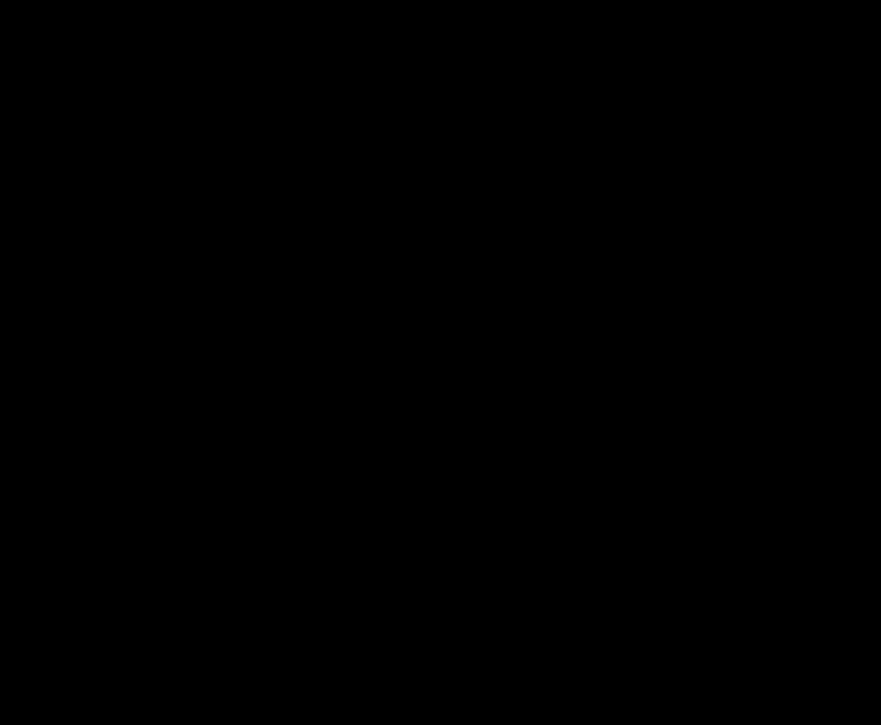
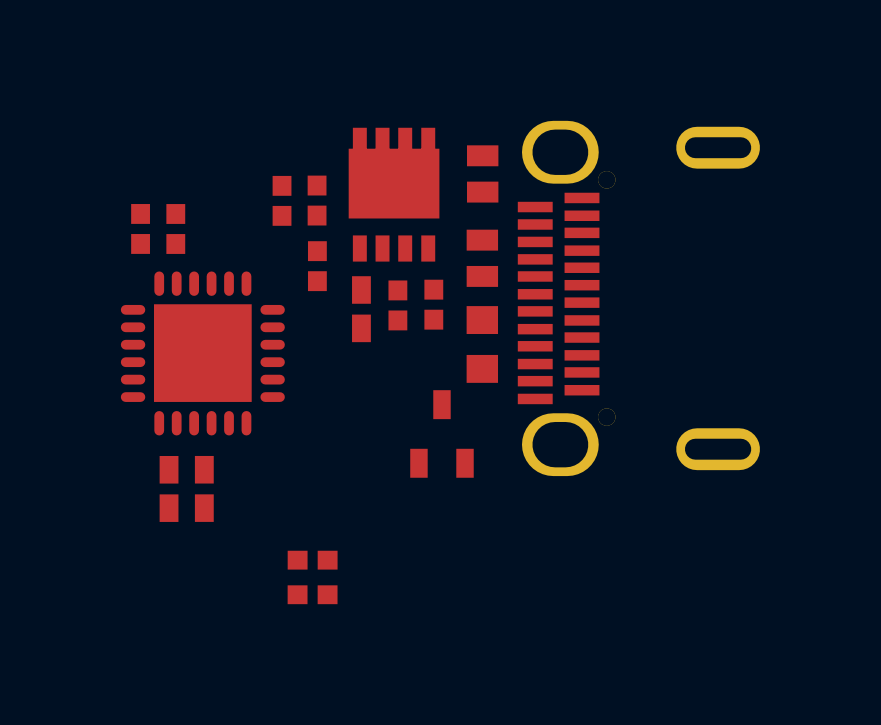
part: none -> (482, 173)
part: none -> (394, 194)
part: none -> (282, 200)
part: none -> (317, 200)
part: none -> (140, 228)
part: none -> (175, 228)
part: none -> (482, 258)
part: none -> (317, 266)
part: none -> (638, 298)
part: none -> (433, 304)
part: none -> (397, 305)
part: none -> (361, 309)
part: none -> (482, 344)
part: none -> (202, 353)
part: none -> (441, 433)
part: none -> (169, 488)
part: none -> (204, 488)
part: none -> (312, 560)
part: none -> (312, 594)

